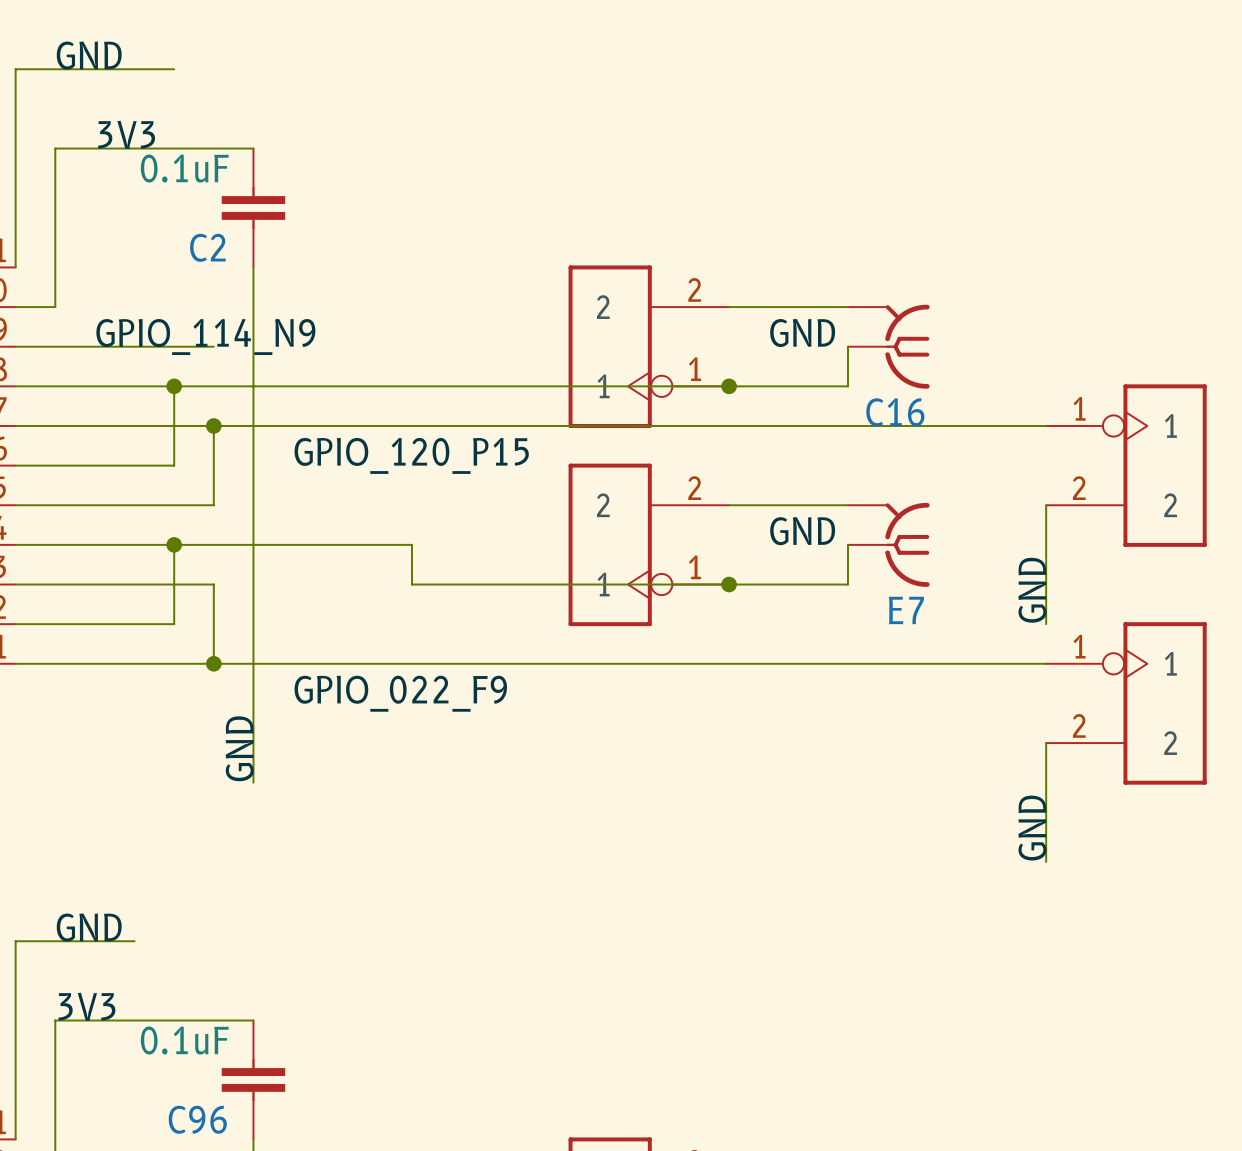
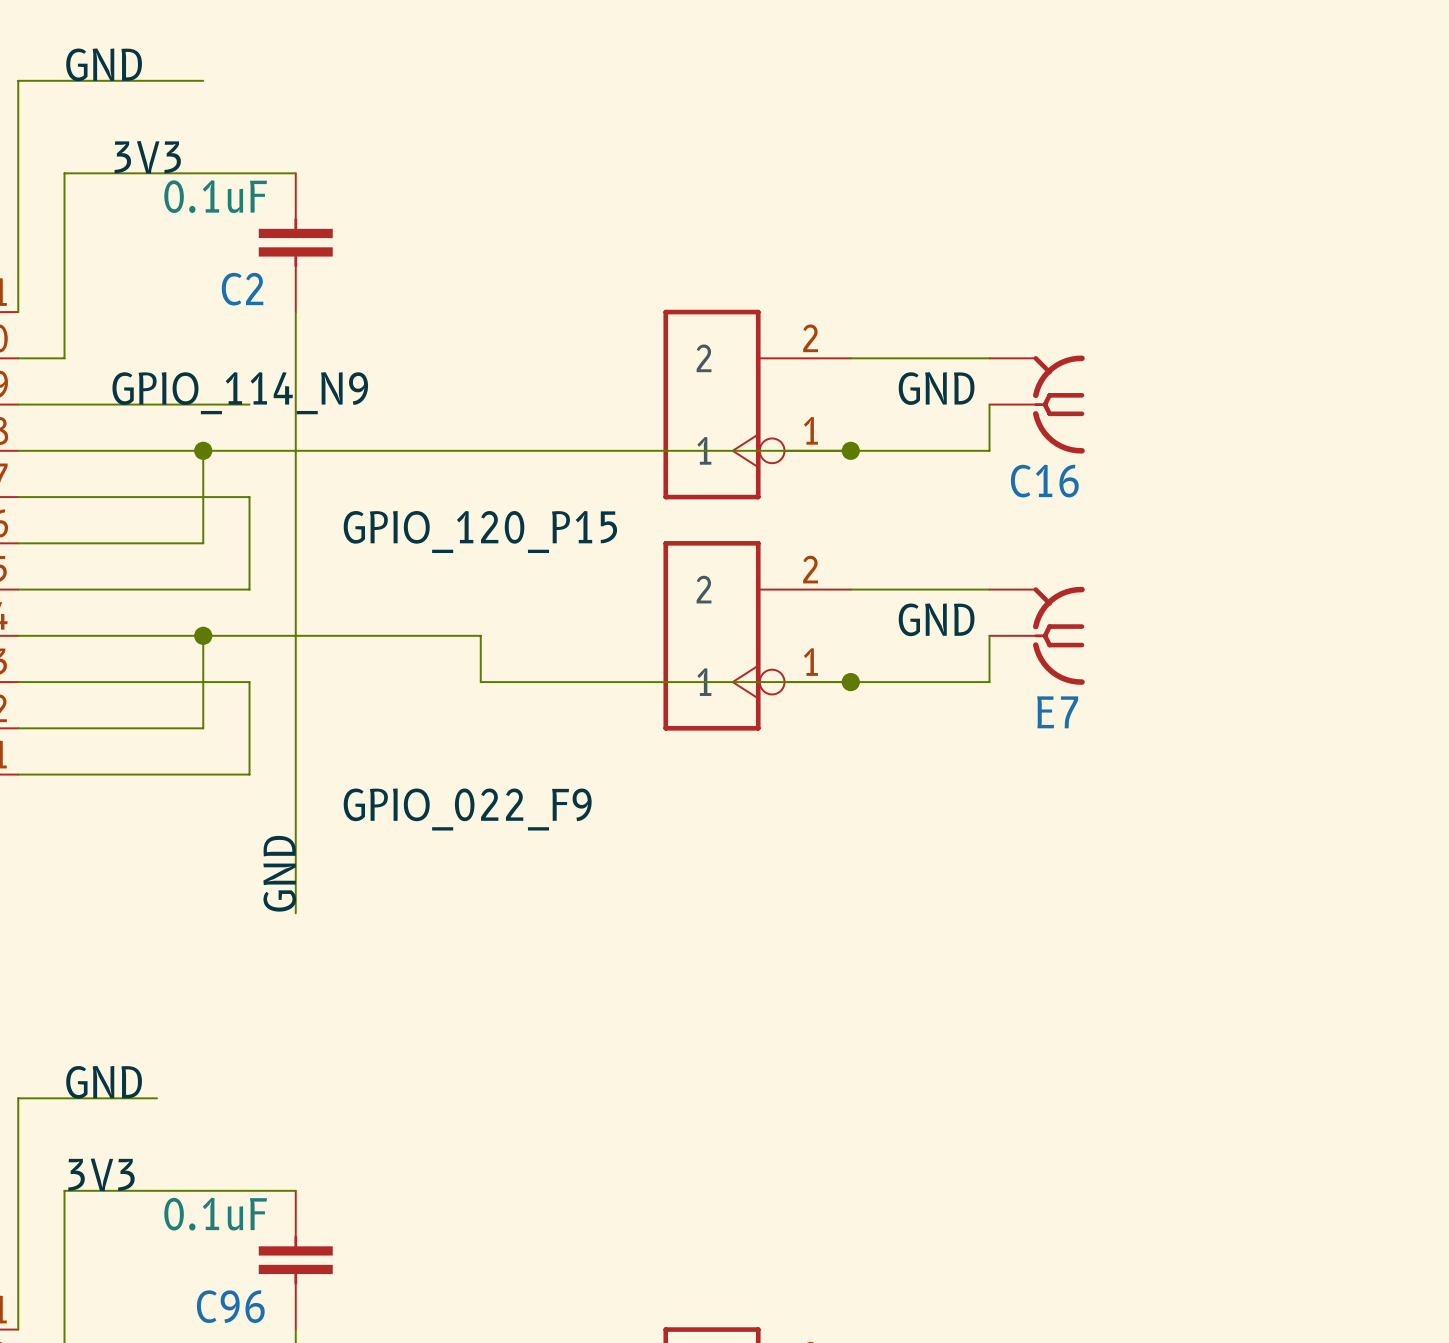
wire: (213, 425) (1046, 425) -> none
junction: (213, 425) -> none
part: (1126, 465) -> none
wire: (1046, 505) (1046, 624) -> none
label: GND (1032, 590) -> none
wire: (213, 663) (1046, 663) -> none
junction: (213, 663) -> none
part: (1126, 703) -> none
wire: (1046, 743) (1046, 861) -> none
label: GND (1032, 828) -> none

